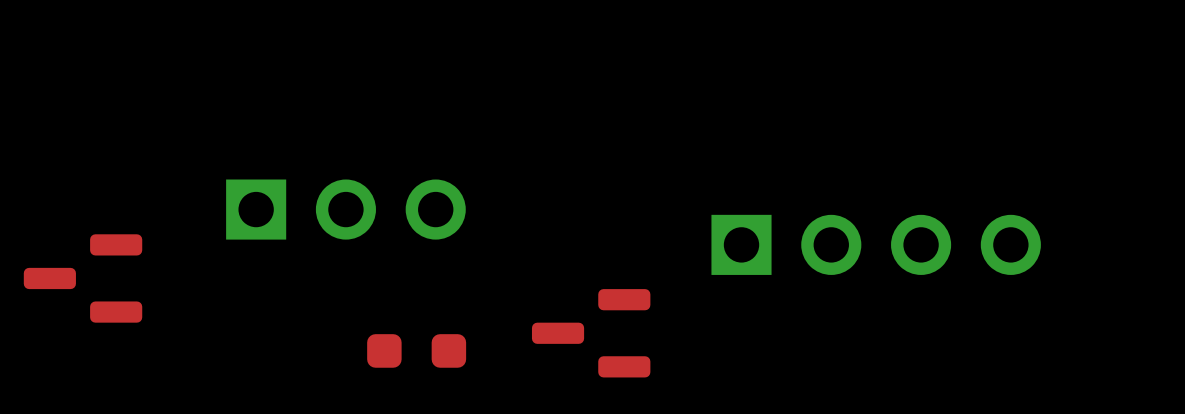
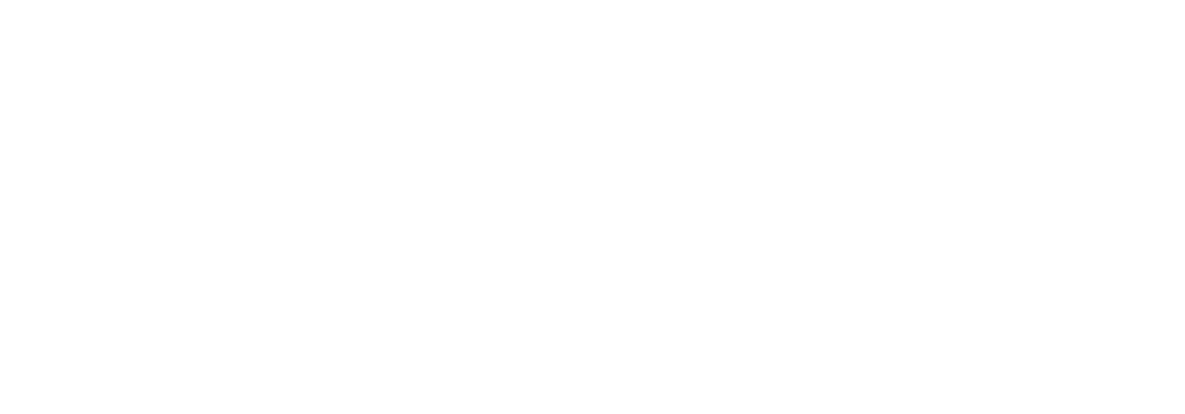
part: (345, 209) -> none
part: (876, 244) -> none
part: (83, 278) -> none
part: (591, 333) -> none
part: (416, 350) -> none

